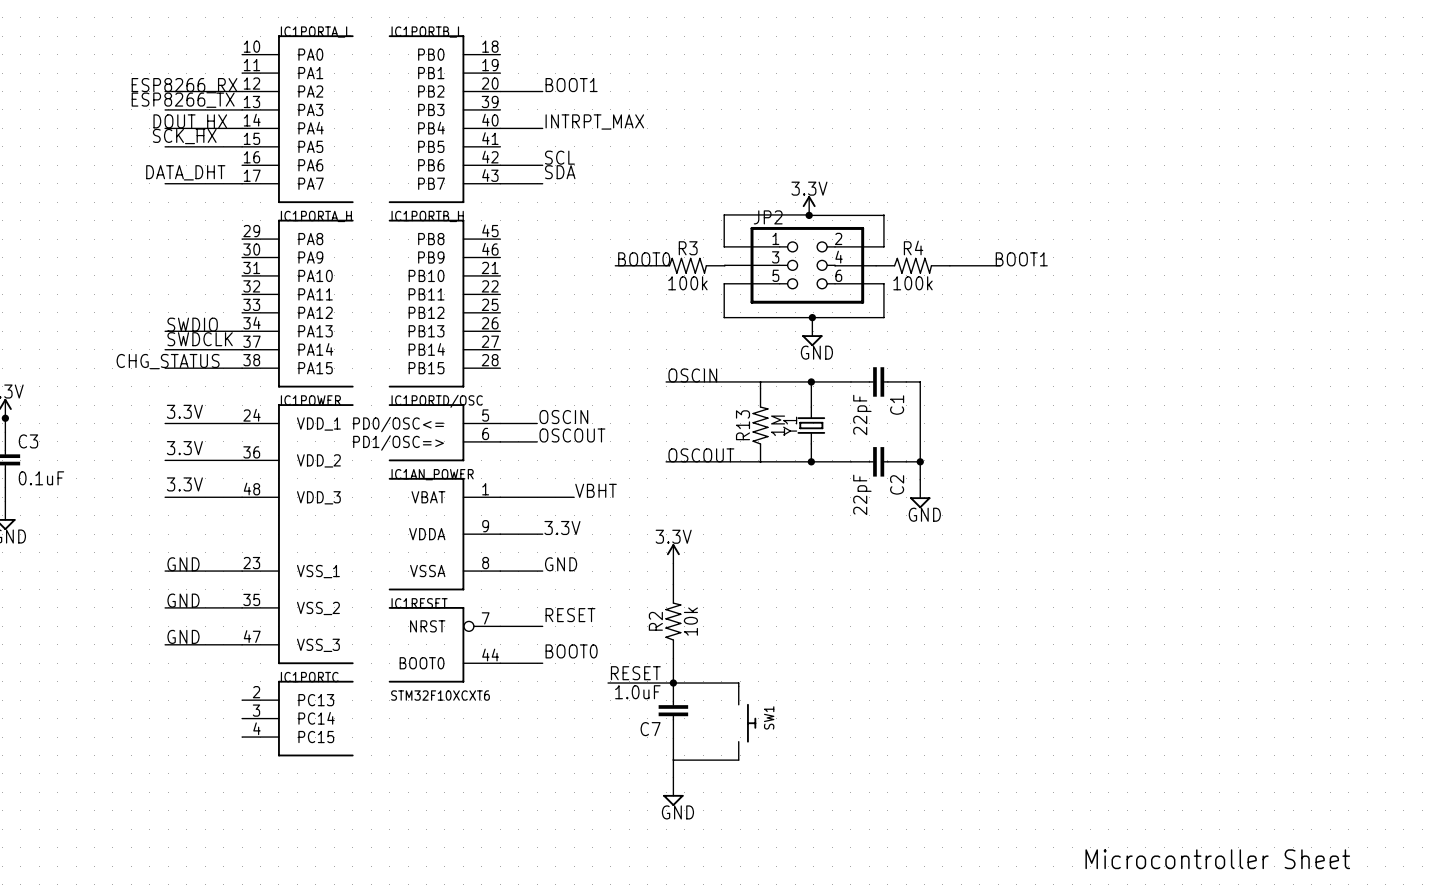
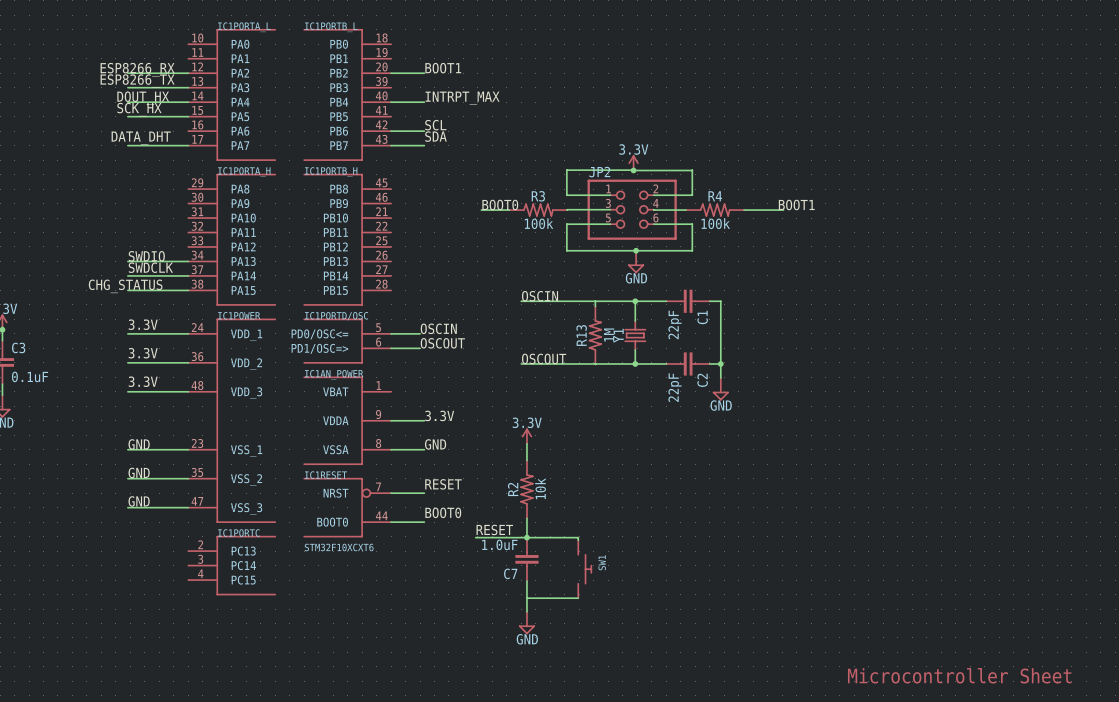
label: VBHT (596, 490) -> none
wire: (500, 497) (574, 497) -> none

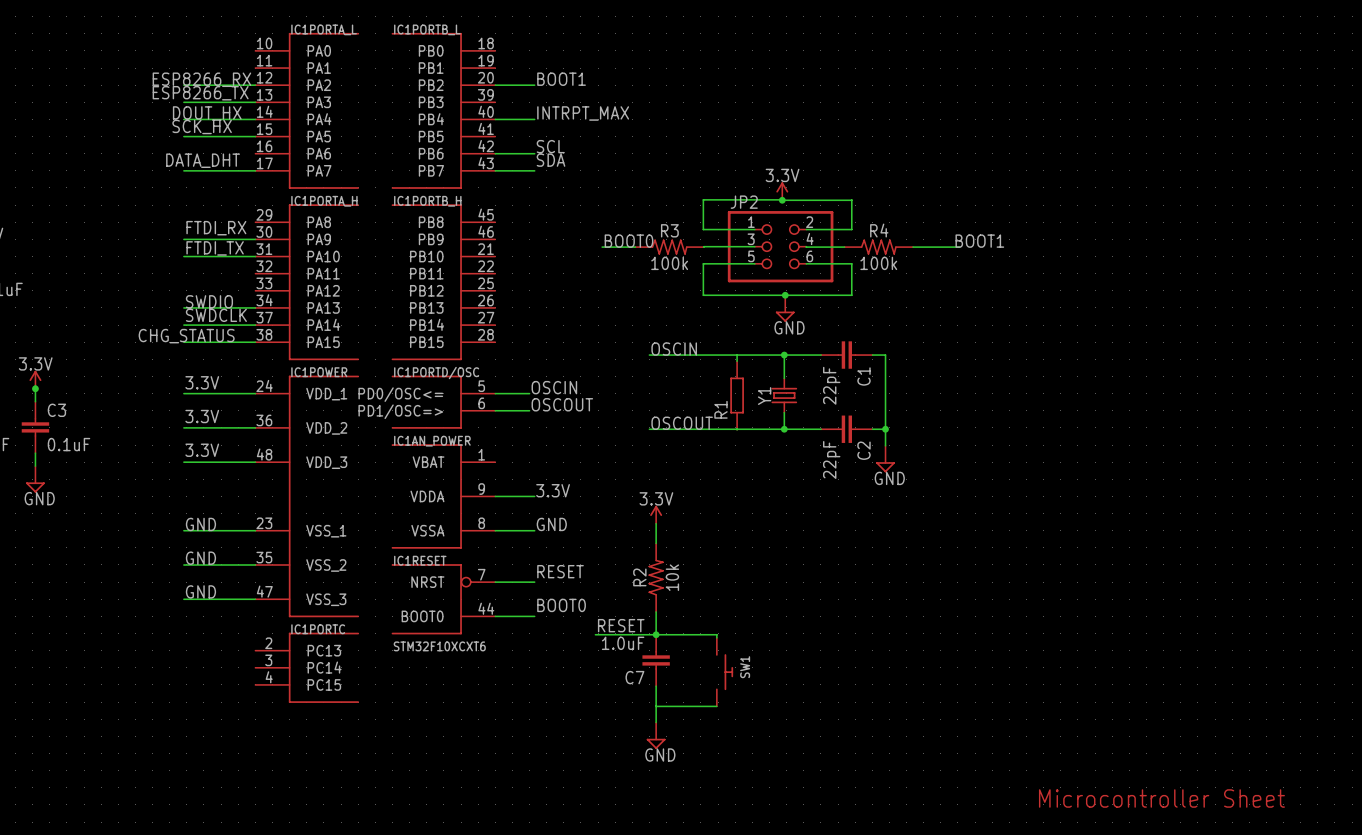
label: none -> FTDI_RX (216, 228)
wire: none -> (183, 239) (255, 239)
label: none -> FTDI_TX (215, 248)
wire: none -> (183, 256) (255, 256)
R13: 1M (595, 335) -> none
R1: none -> (737, 395)

